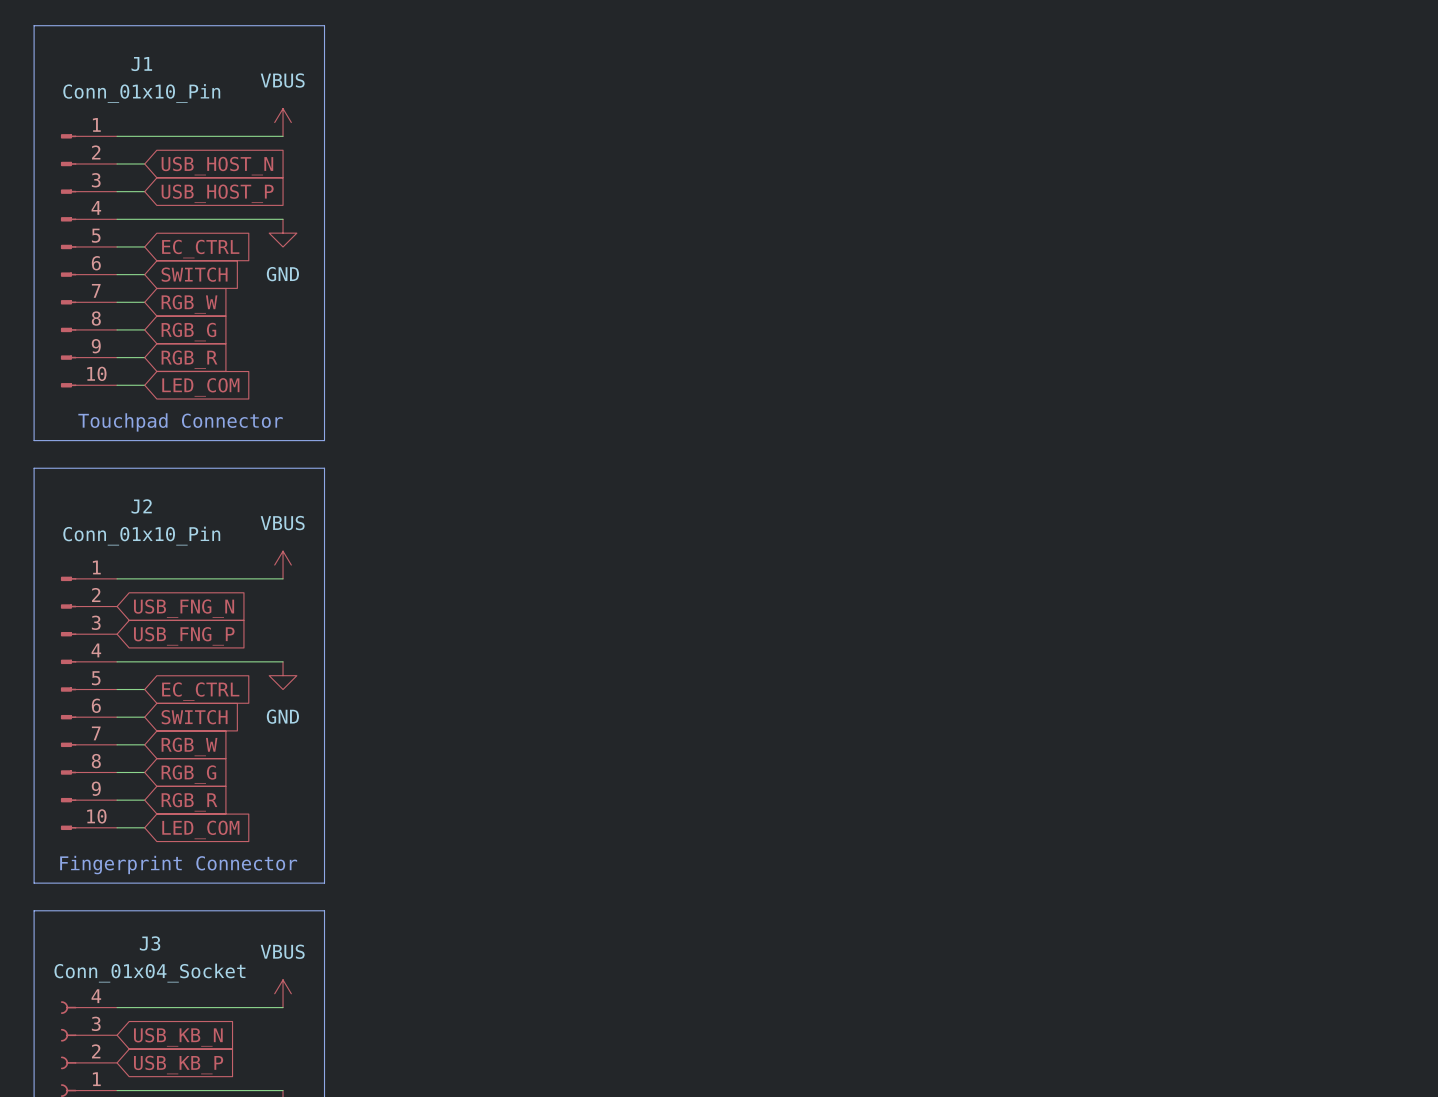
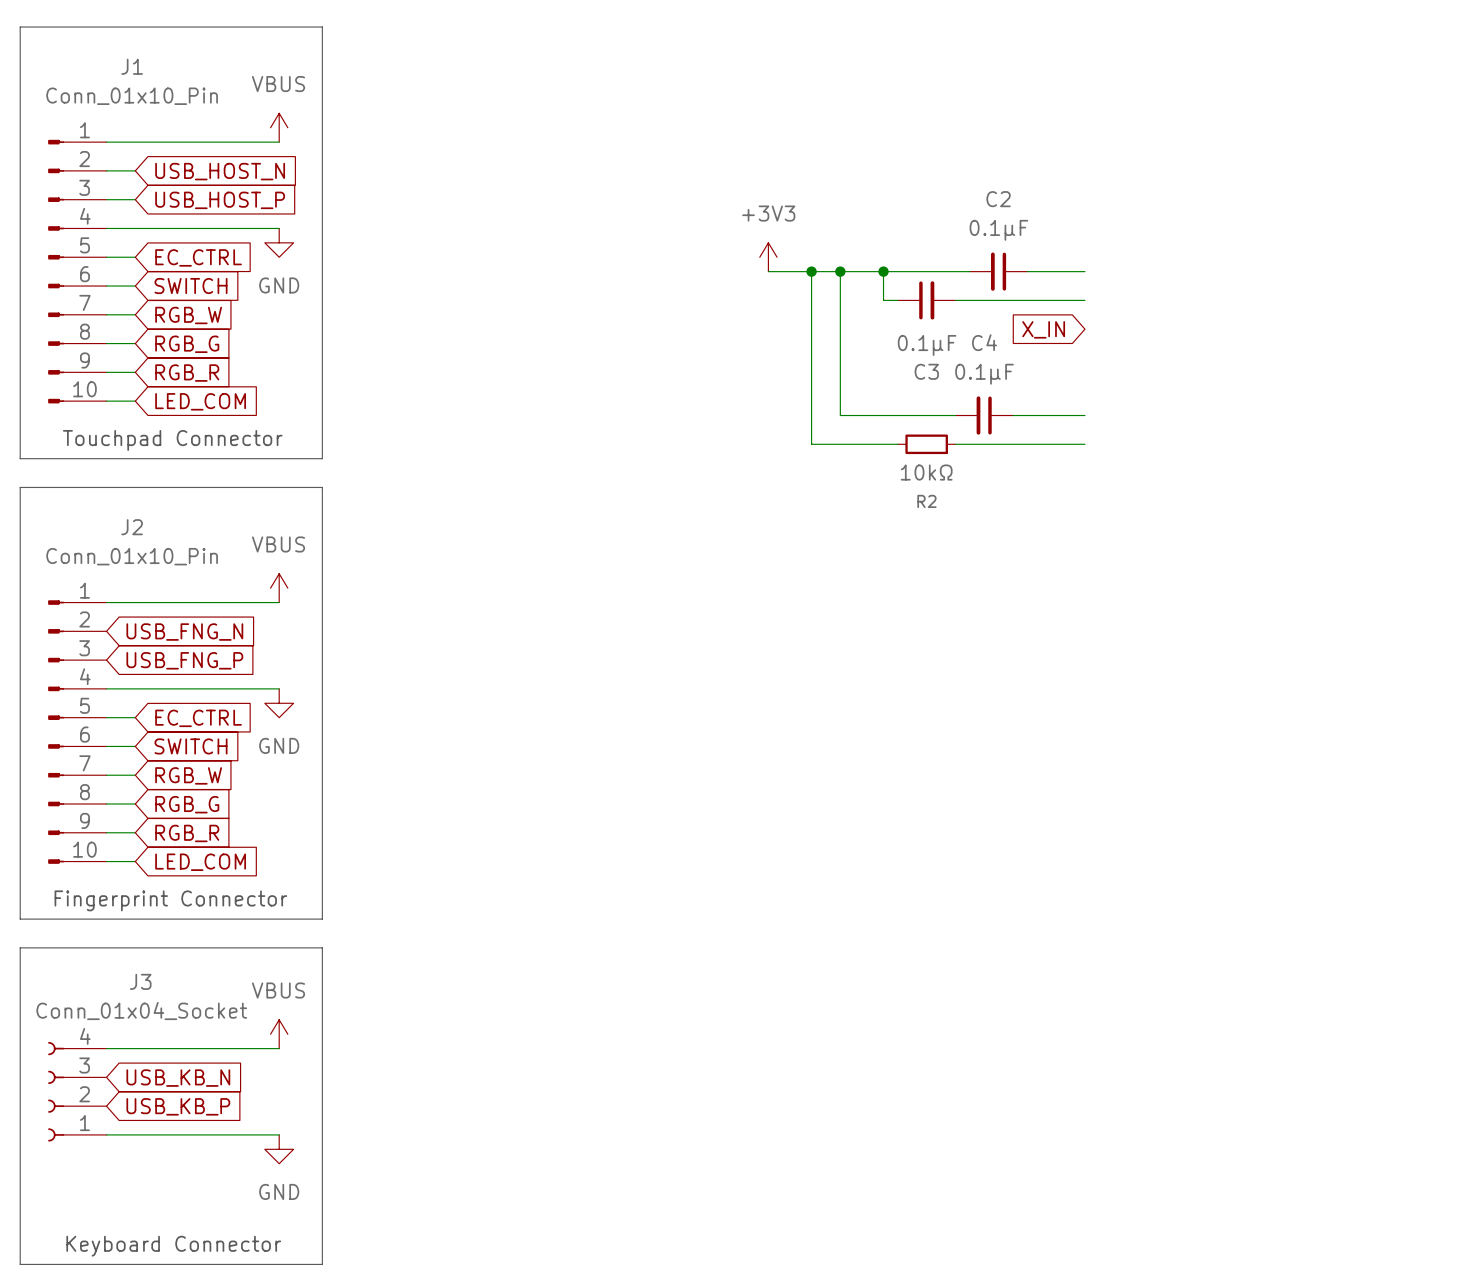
power symbol: none -> +3V3 (768, 257)
wire: none -> (768, 271) (969, 271)
wire: none -> (811, 271) (811, 444) (897, 444)
junction: none -> (811, 271)
wire: none -> (840, 271) (840, 415) (955, 415)
junction: none -> (840, 271)
wire: none -> (883, 271) (883, 300) (897, 300)
junction: none -> (883, 271)
C2: none -> 0.1μF (998, 271)
wire: none -> (1027, 271) (1084, 271)
C3: none -> 0.1μF (926, 300)
wire: none -> (955, 300) (1084, 300)
global label: none -> X_IN (1043, 329)
C4: none -> 0.1μF (984, 415)
wire: none -> (1013, 415) (1084, 415)
R2: none -> 10kΩ (926, 444)
wire: none -> (955, 444) (1084, 444)

